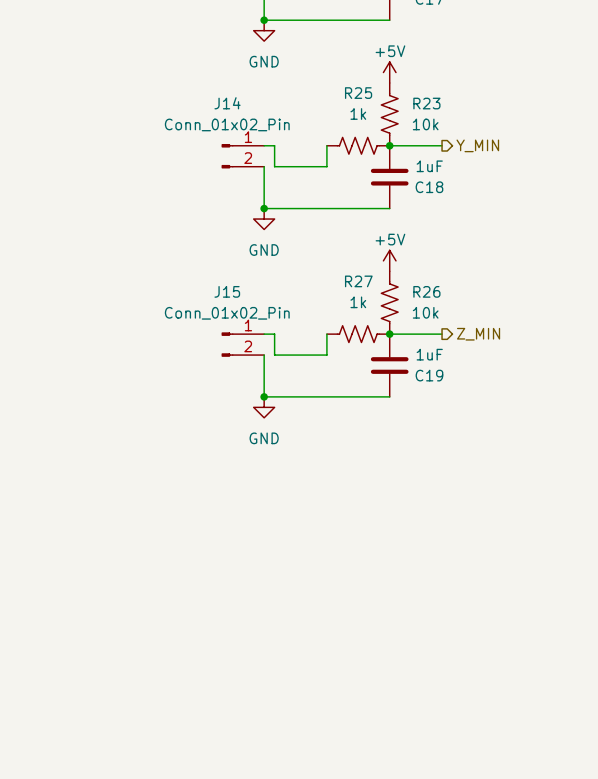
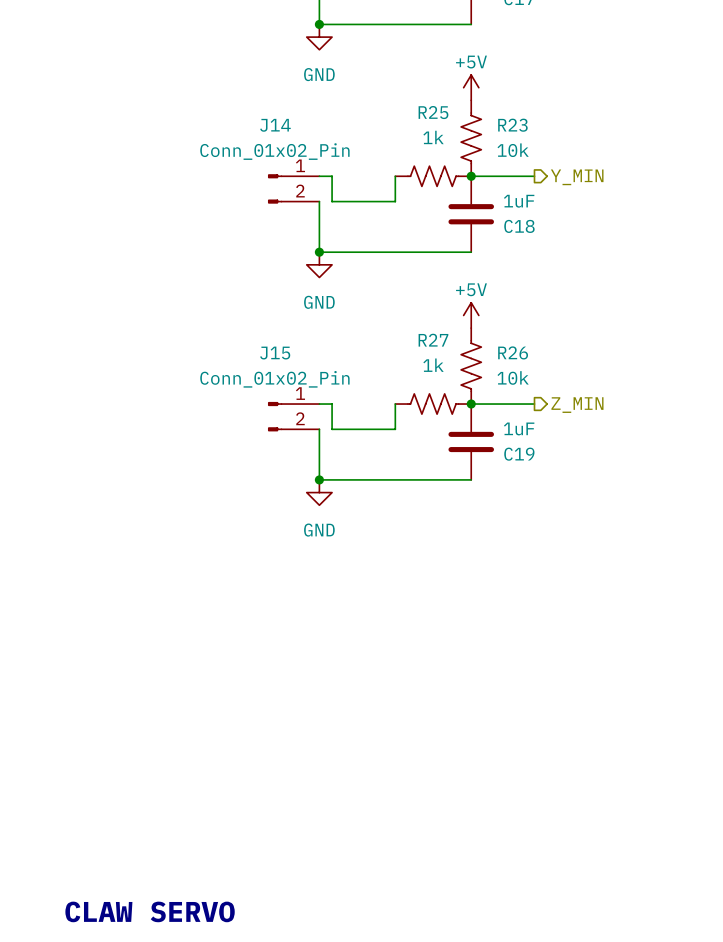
text: none -> CLAW SERVO (150, 911)

